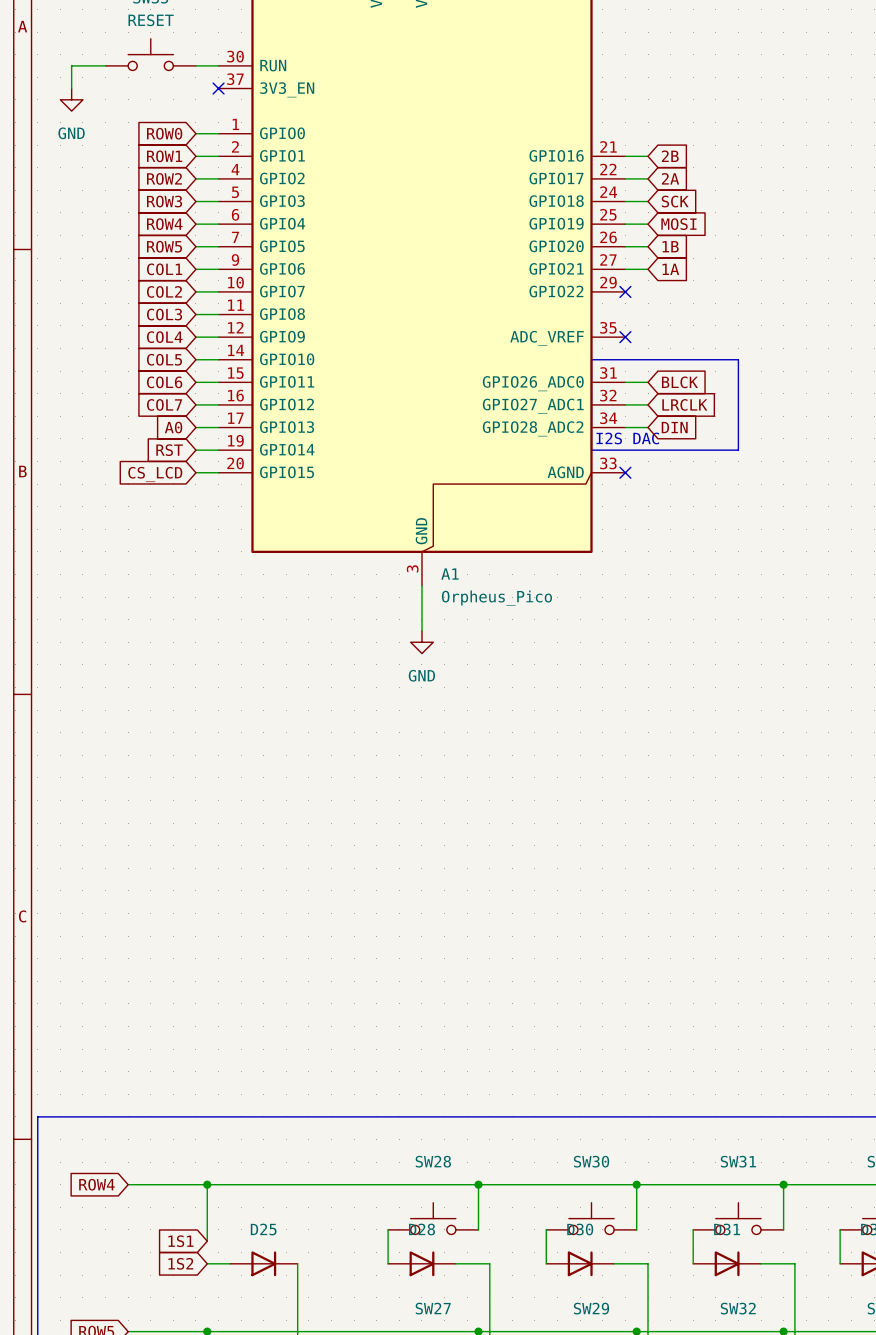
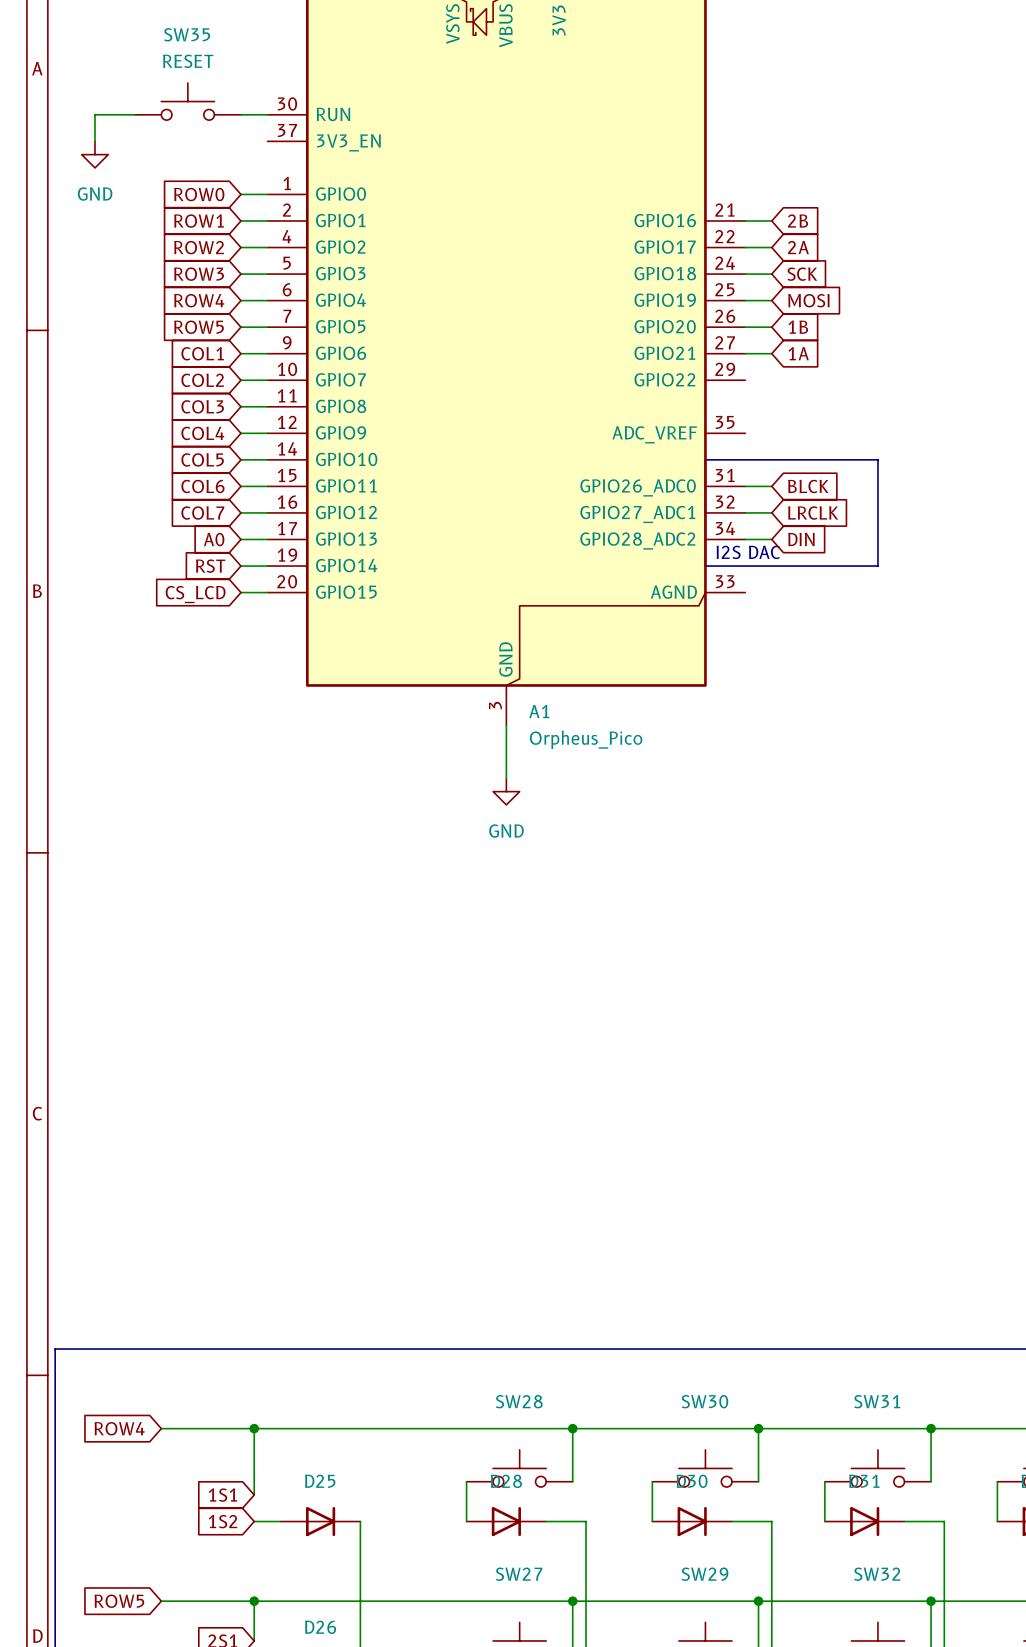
no-connect mark: (218, 88) -> none
no-connect mark: (625, 291) -> none
no-connect mark: (625, 337) -> none
no-connect mark: (625, 472) -> none

